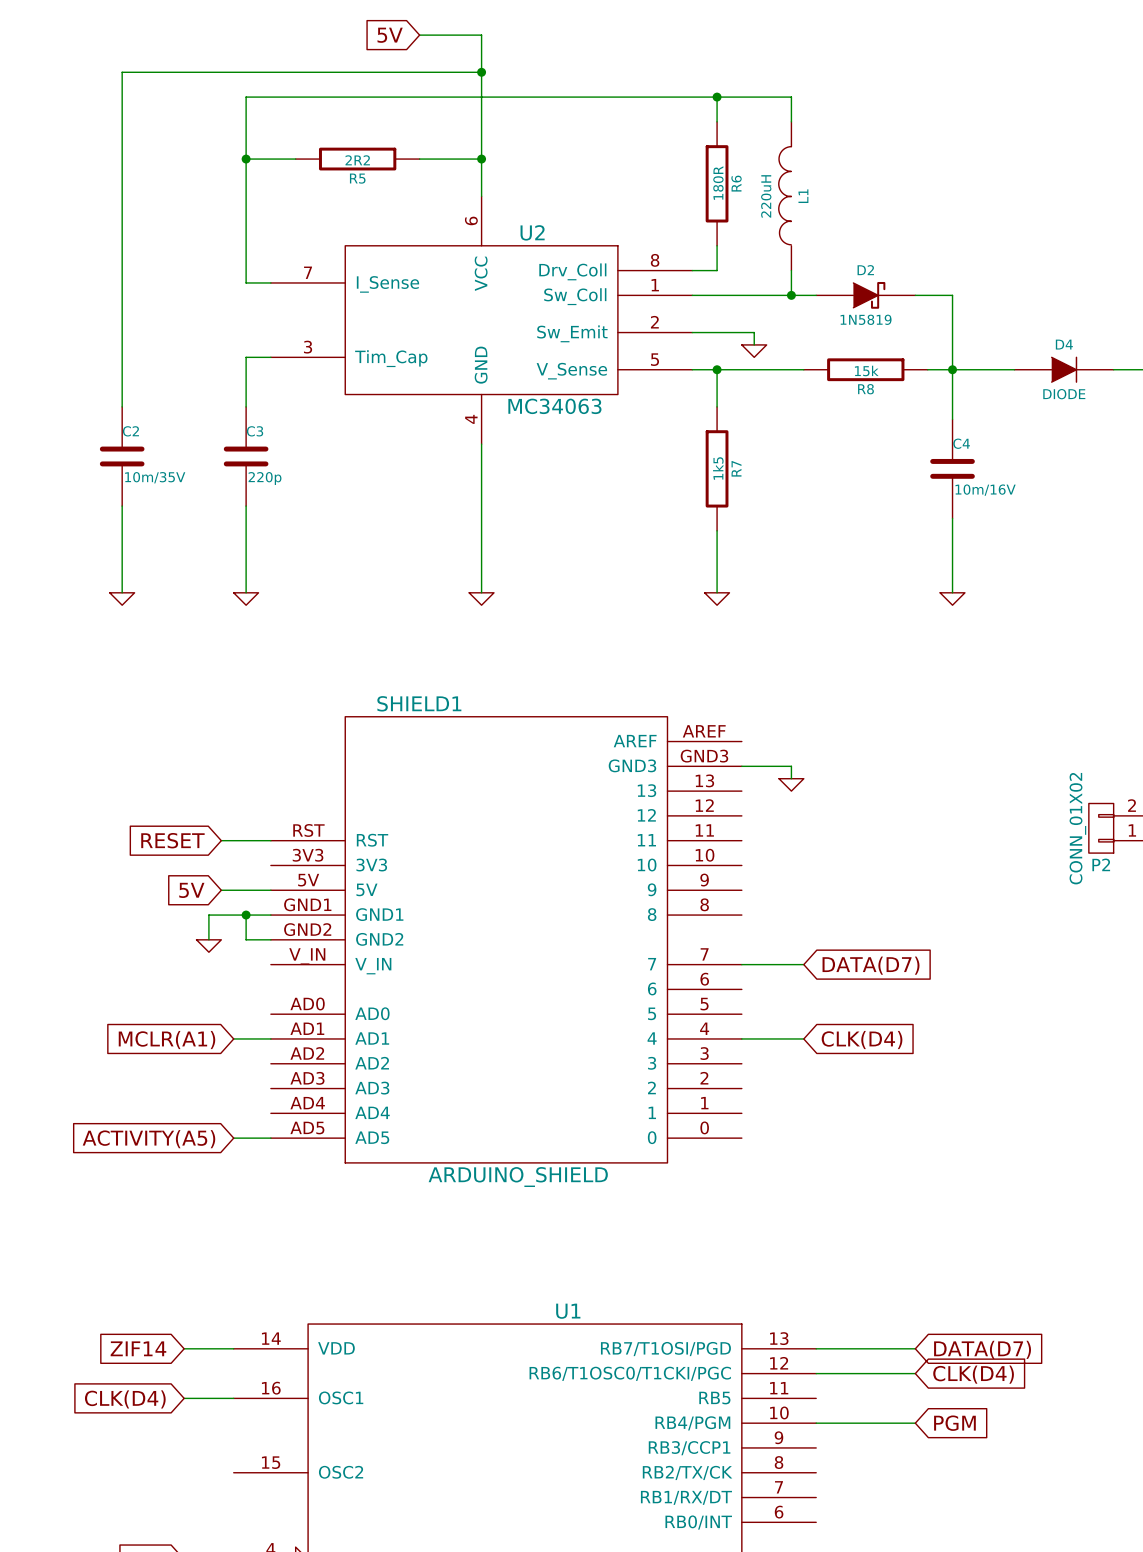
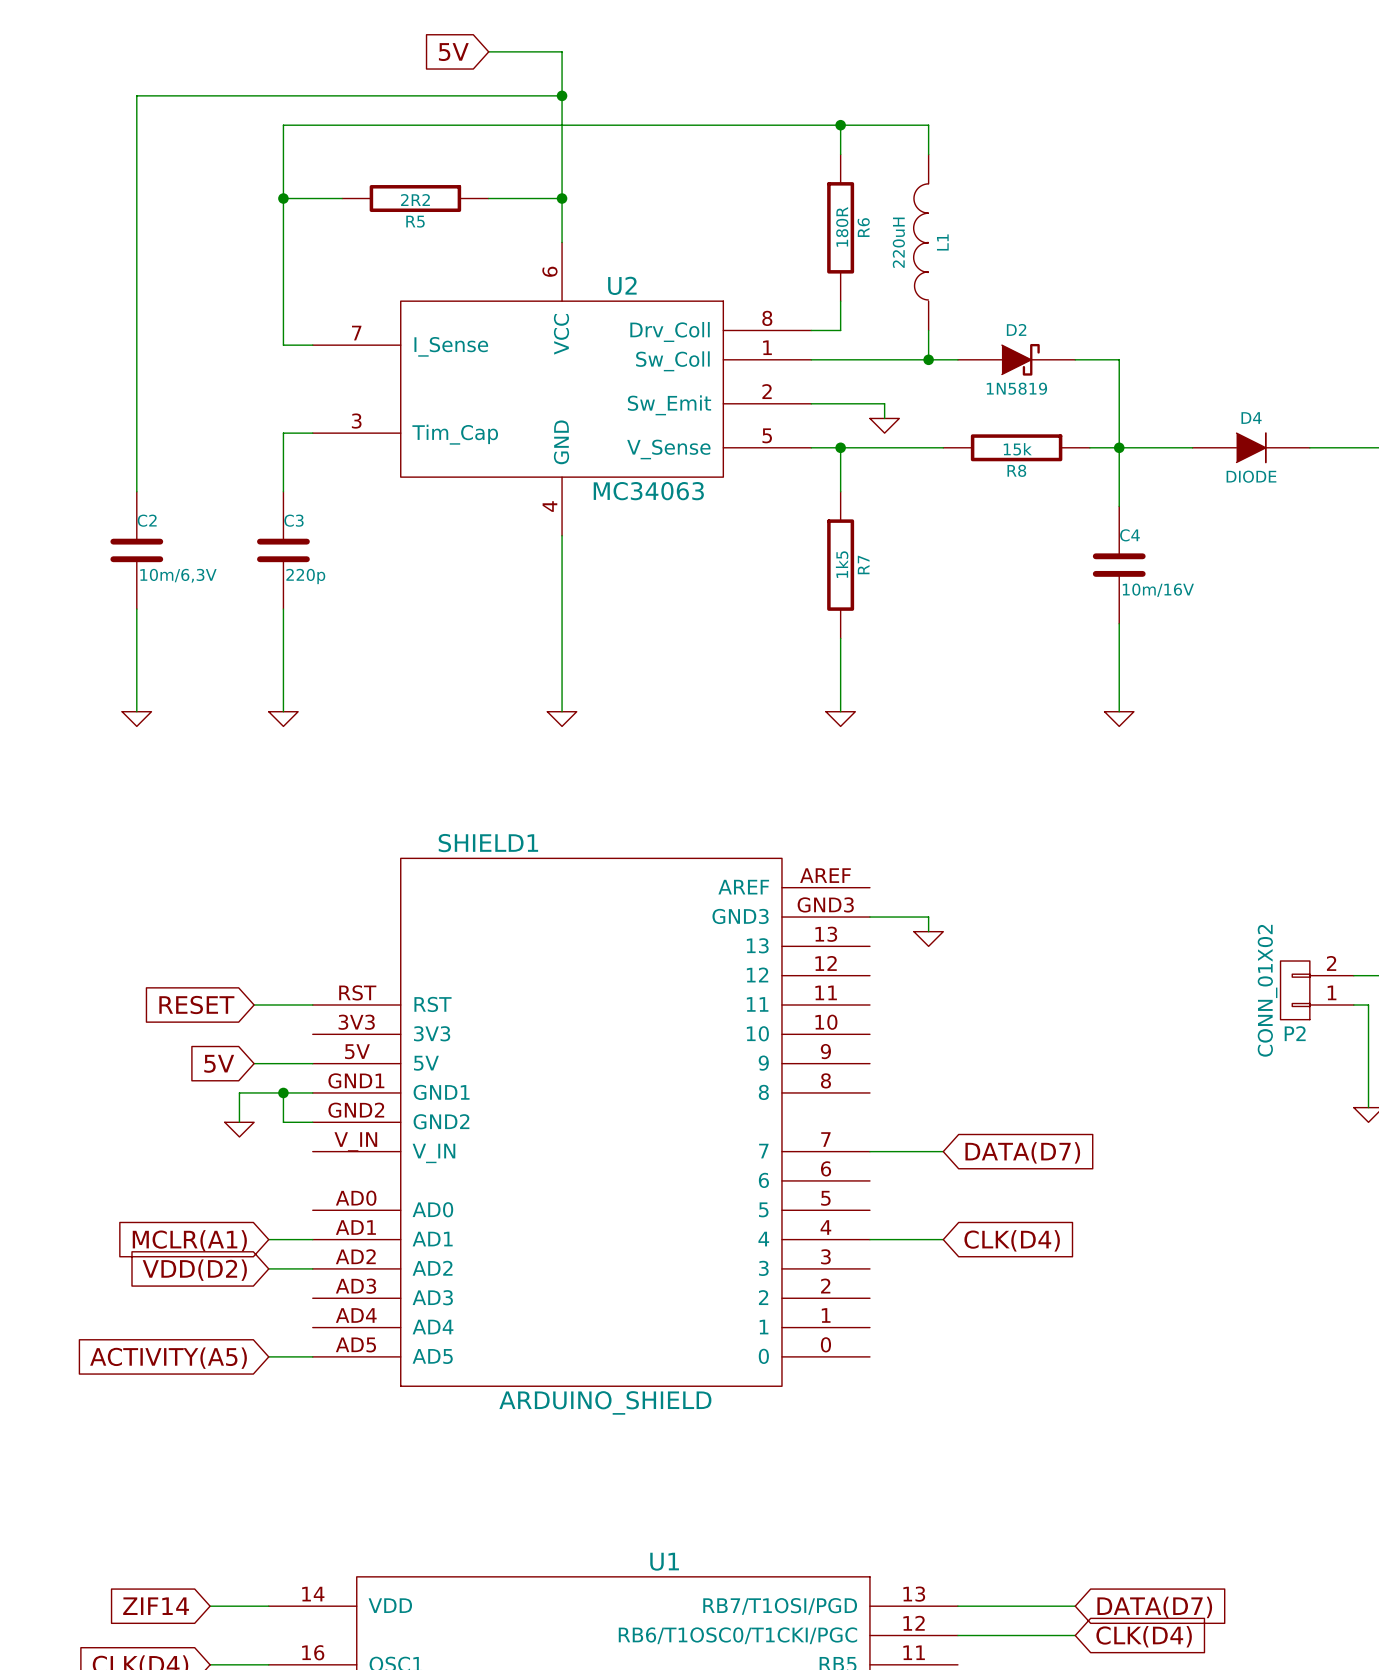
C2 value: 10m/35V (155, 477) -> 10m/6,3V (178, 575)
wire: none -> (268, 1268) (312, 1268)
global label: none -> VDD(D2) (194, 1270)

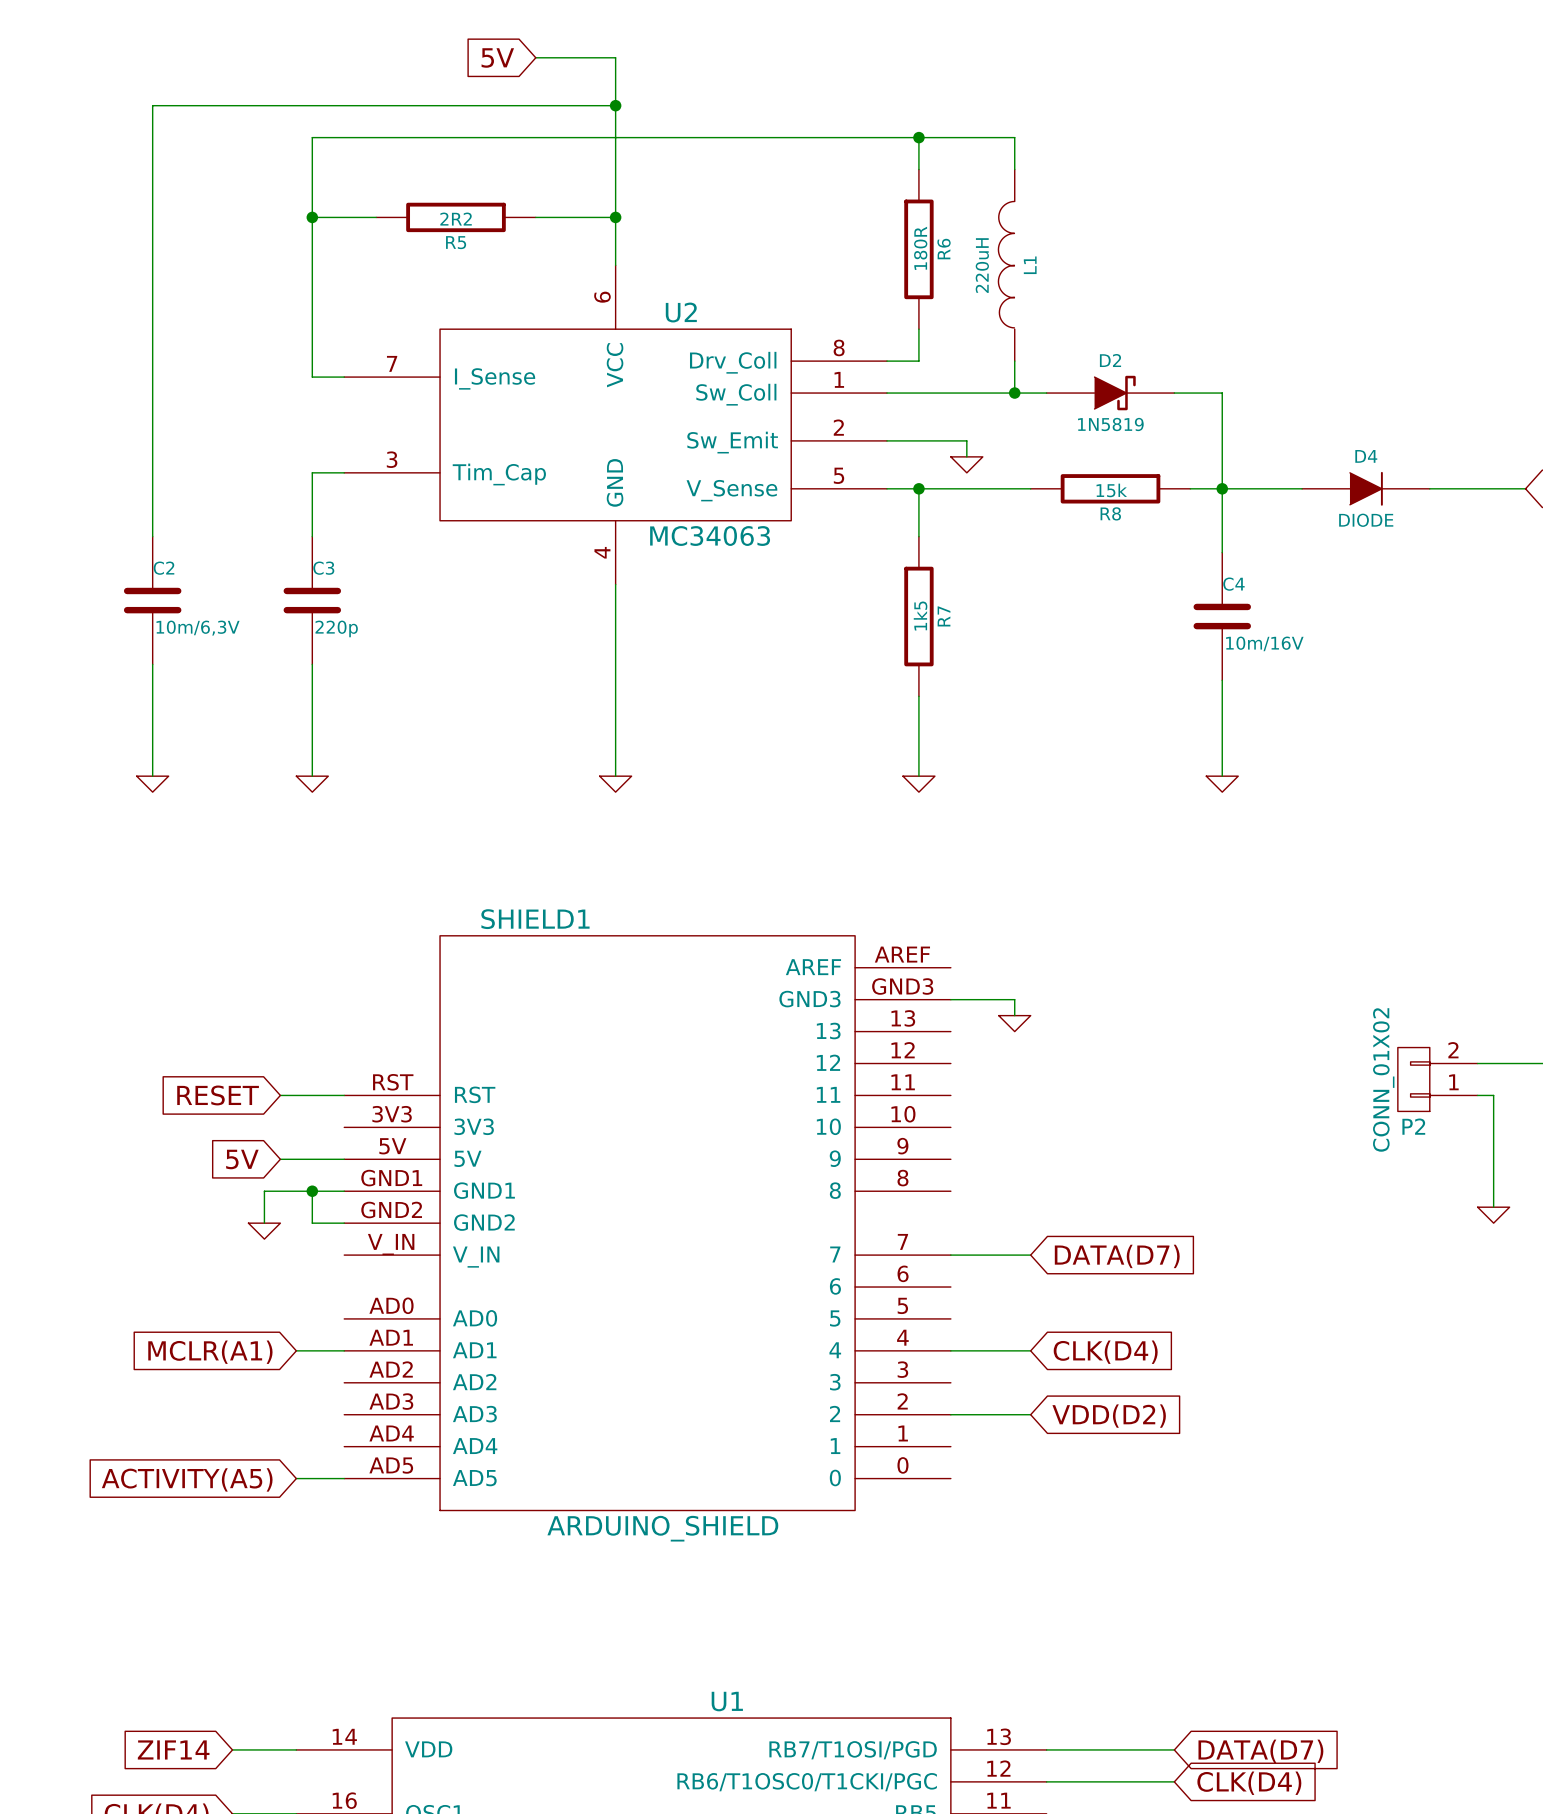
wire: (268, 1268) (312, 1268) -> none
global label: VDD(D2) (194, 1270) -> none
wire: none -> (950, 1414) (1030, 1414)
global label: none -> VDD(D2) (1109, 1416)

